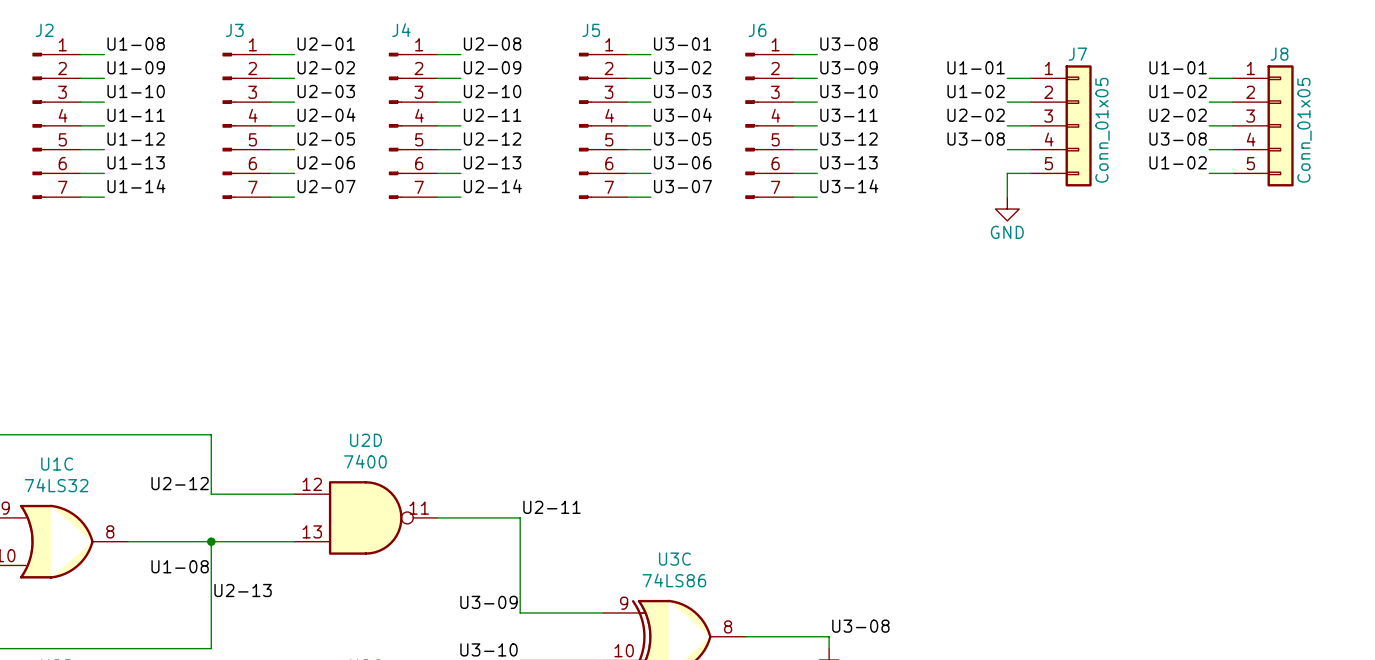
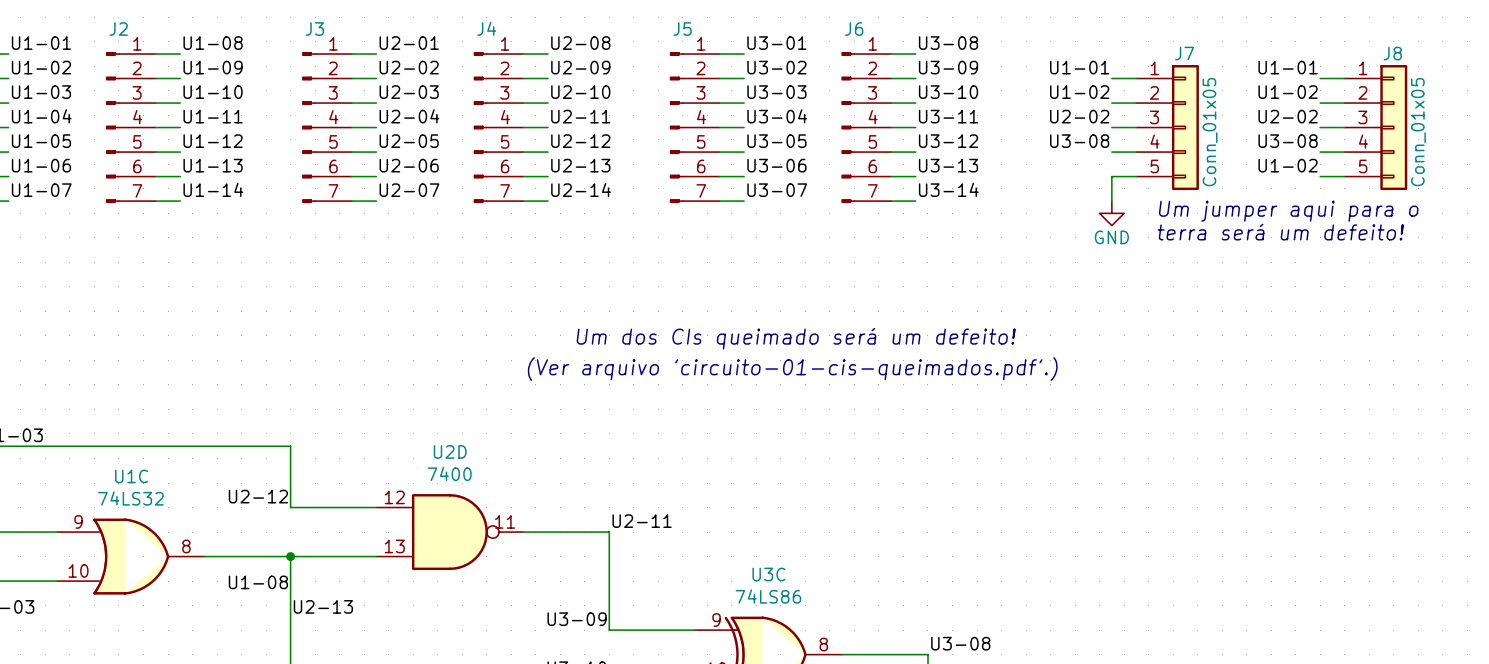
text: none -> Um jumper aqui para o (1288, 211)
text: none -> terra será um defeito! (1280, 232)
text: none -> Um dos CIs queimado será um defeito! (796, 338)
text: none -> (Ver arquivo 'circuito-01-cis-queimados.pdf'.) (792, 369)

